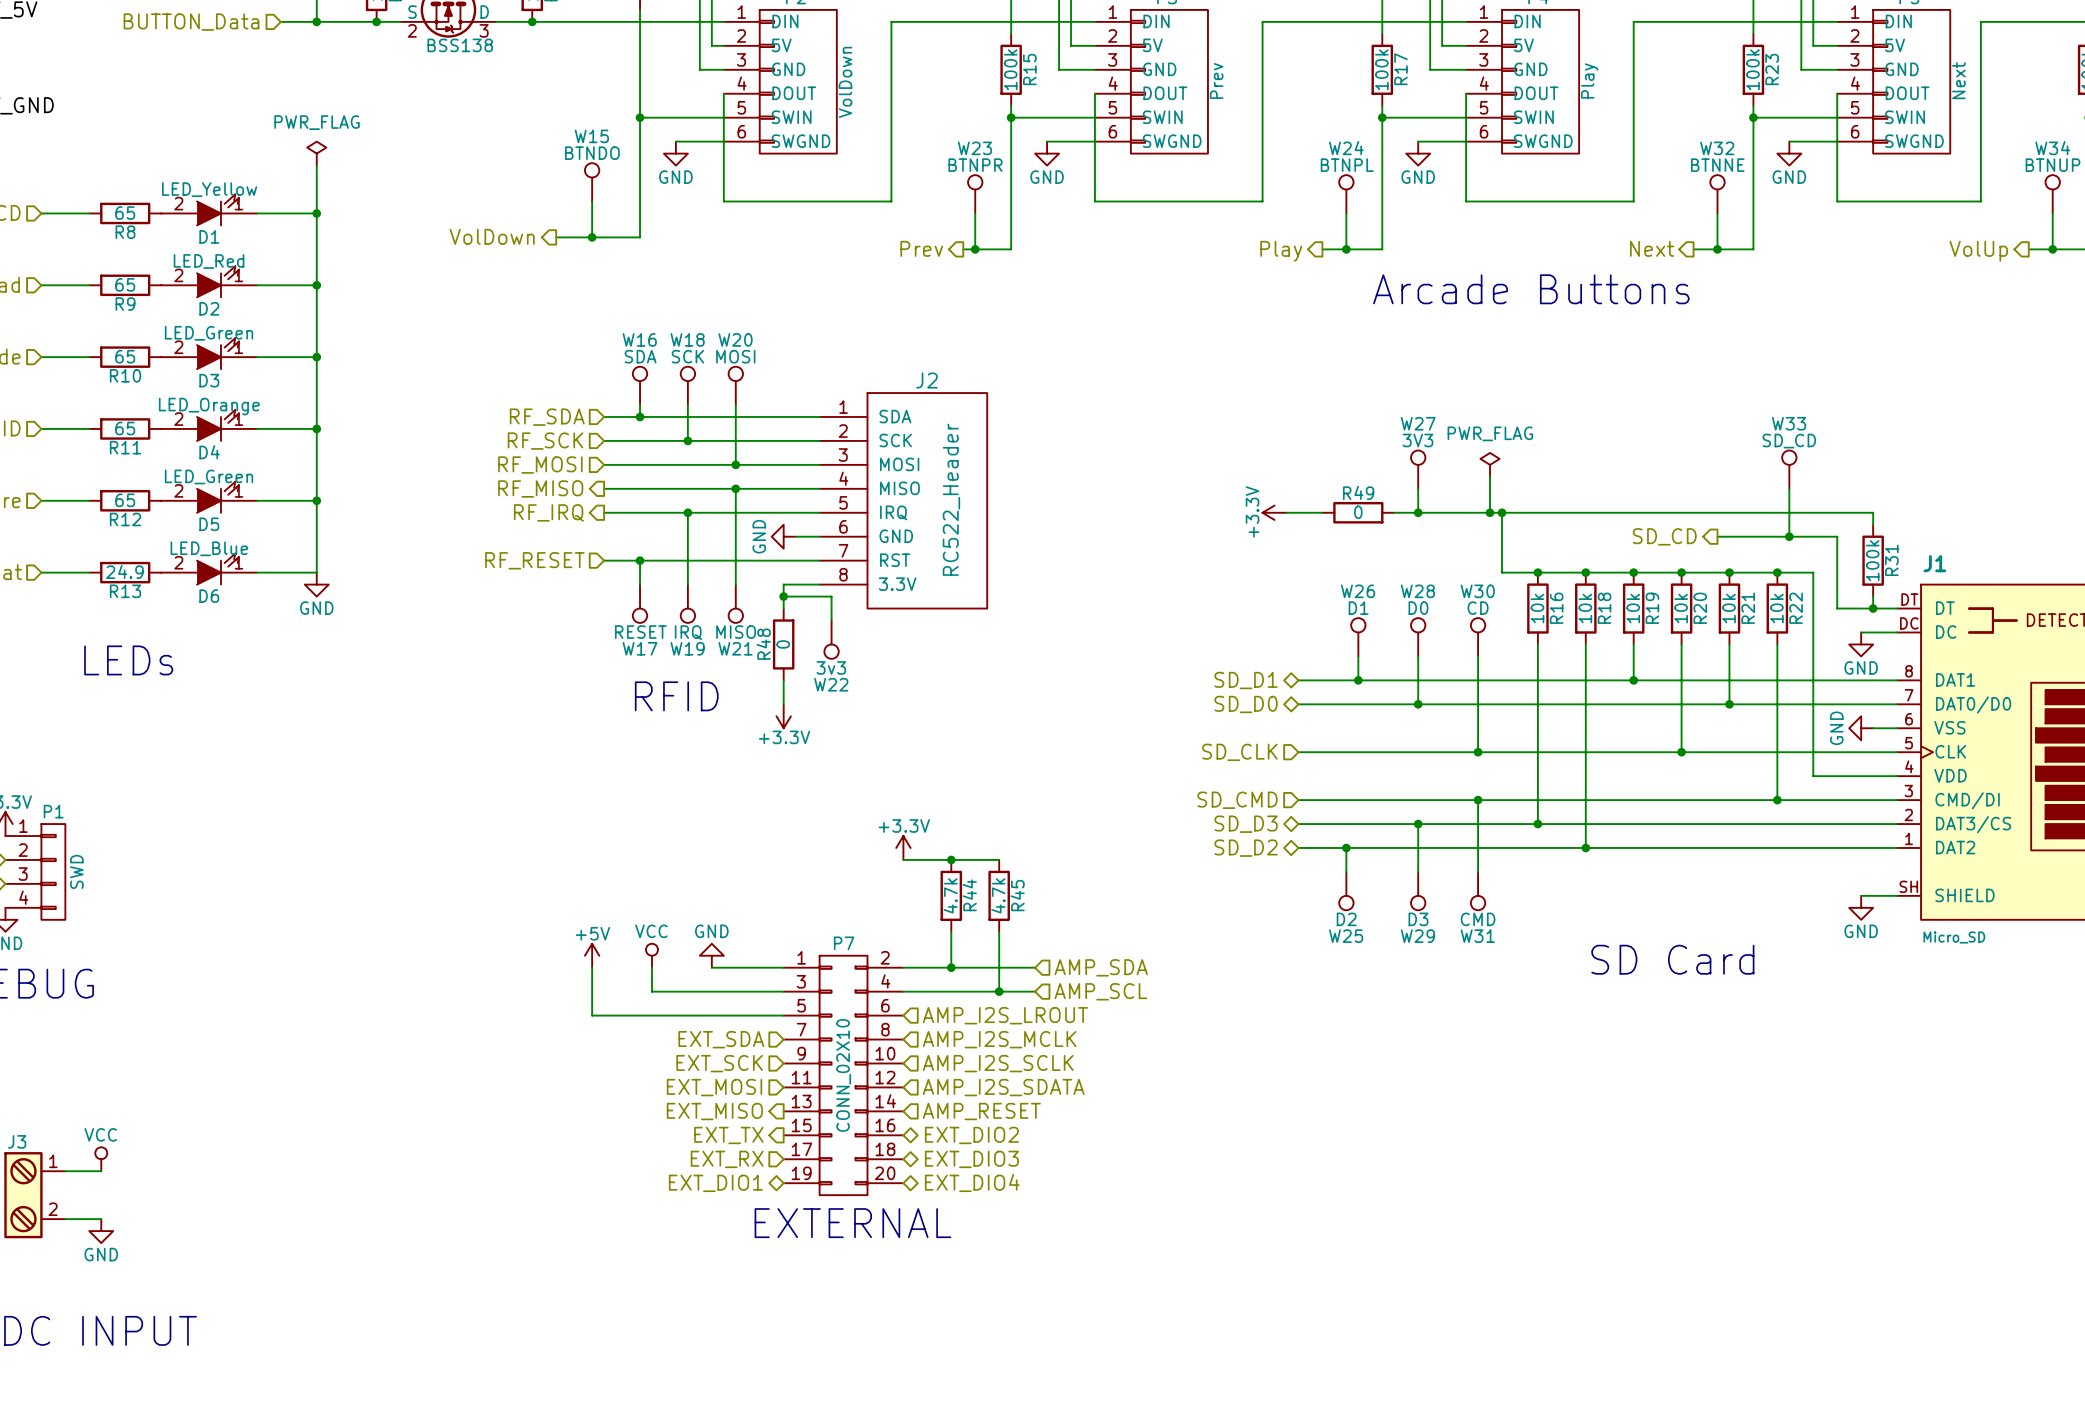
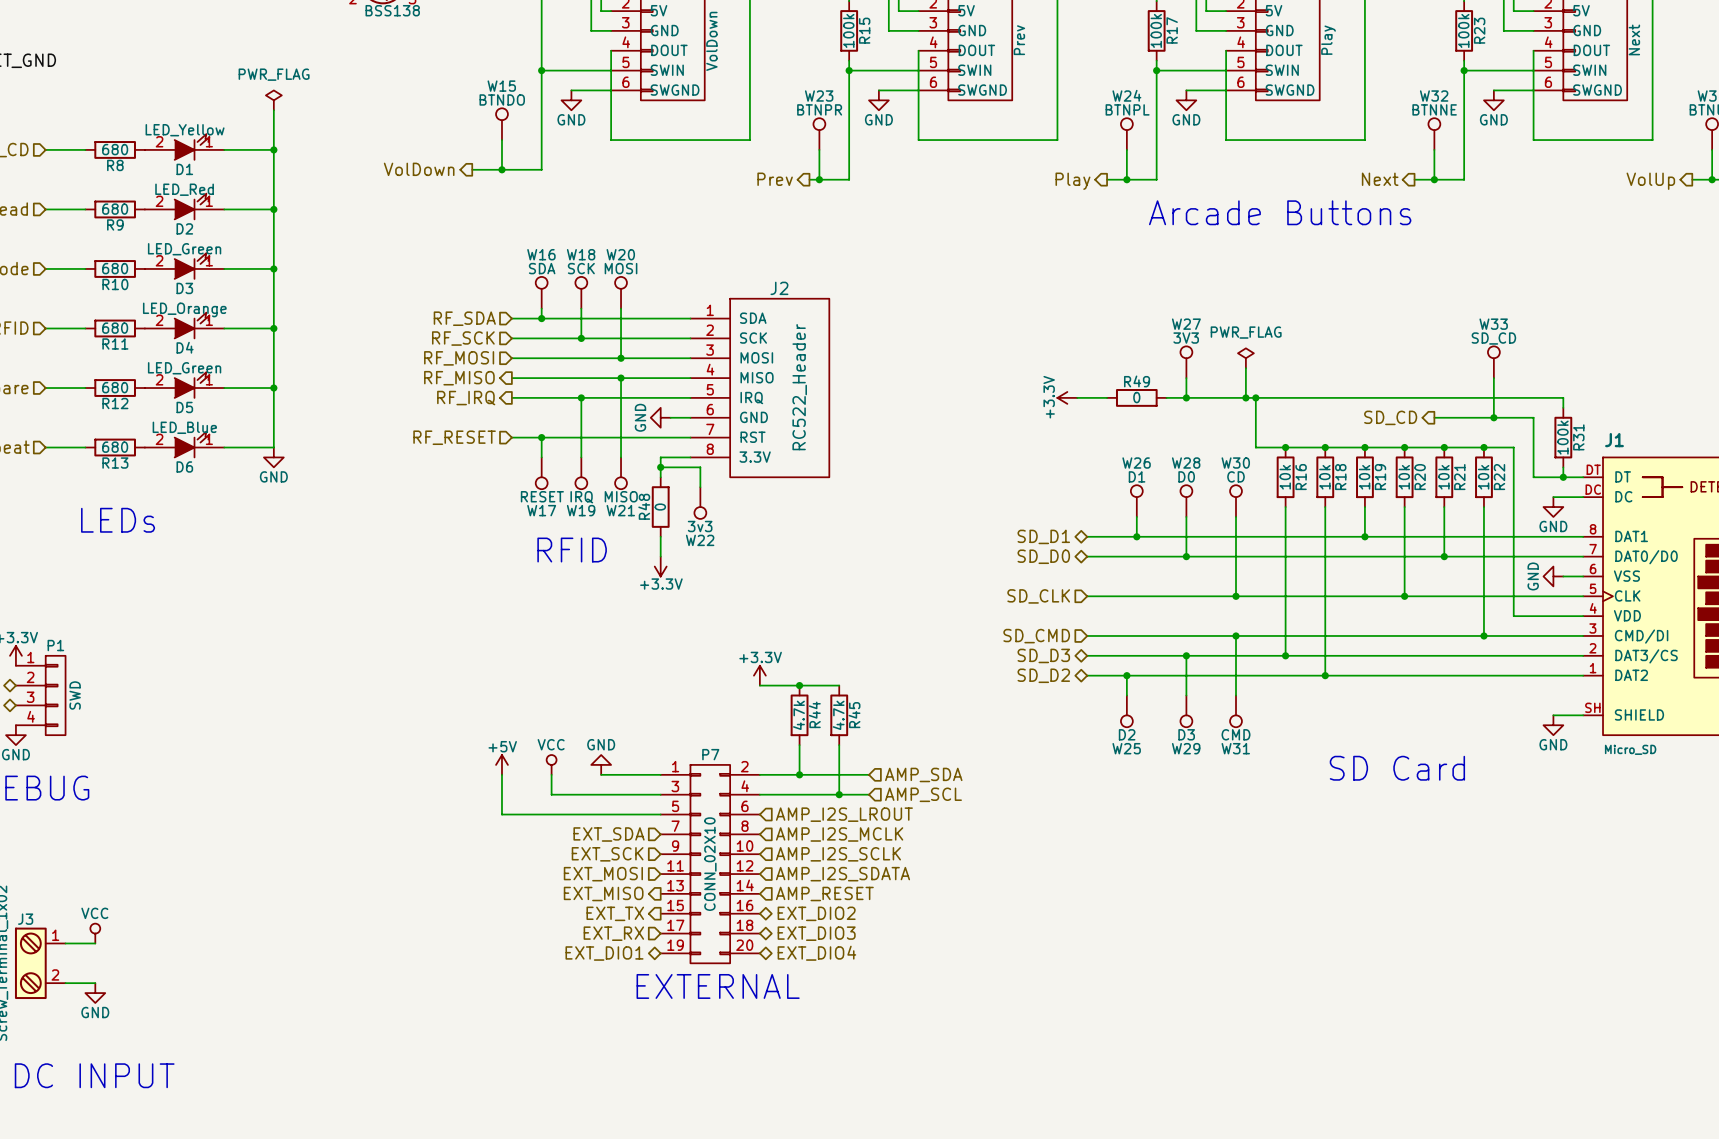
R8 value: 65 (125, 213) -> 680 (115, 149)
R9 value: 65 (125, 284) -> 680 (115, 209)
R10 value: 65 (125, 356) -> 680 (115, 268)
R11 value: 65 (125, 428) -> 680 (115, 328)
R12 value: 65 (125, 500) -> 680 (115, 387)
R13 value: 24.9 (124, 571) -> 680 (115, 447)

